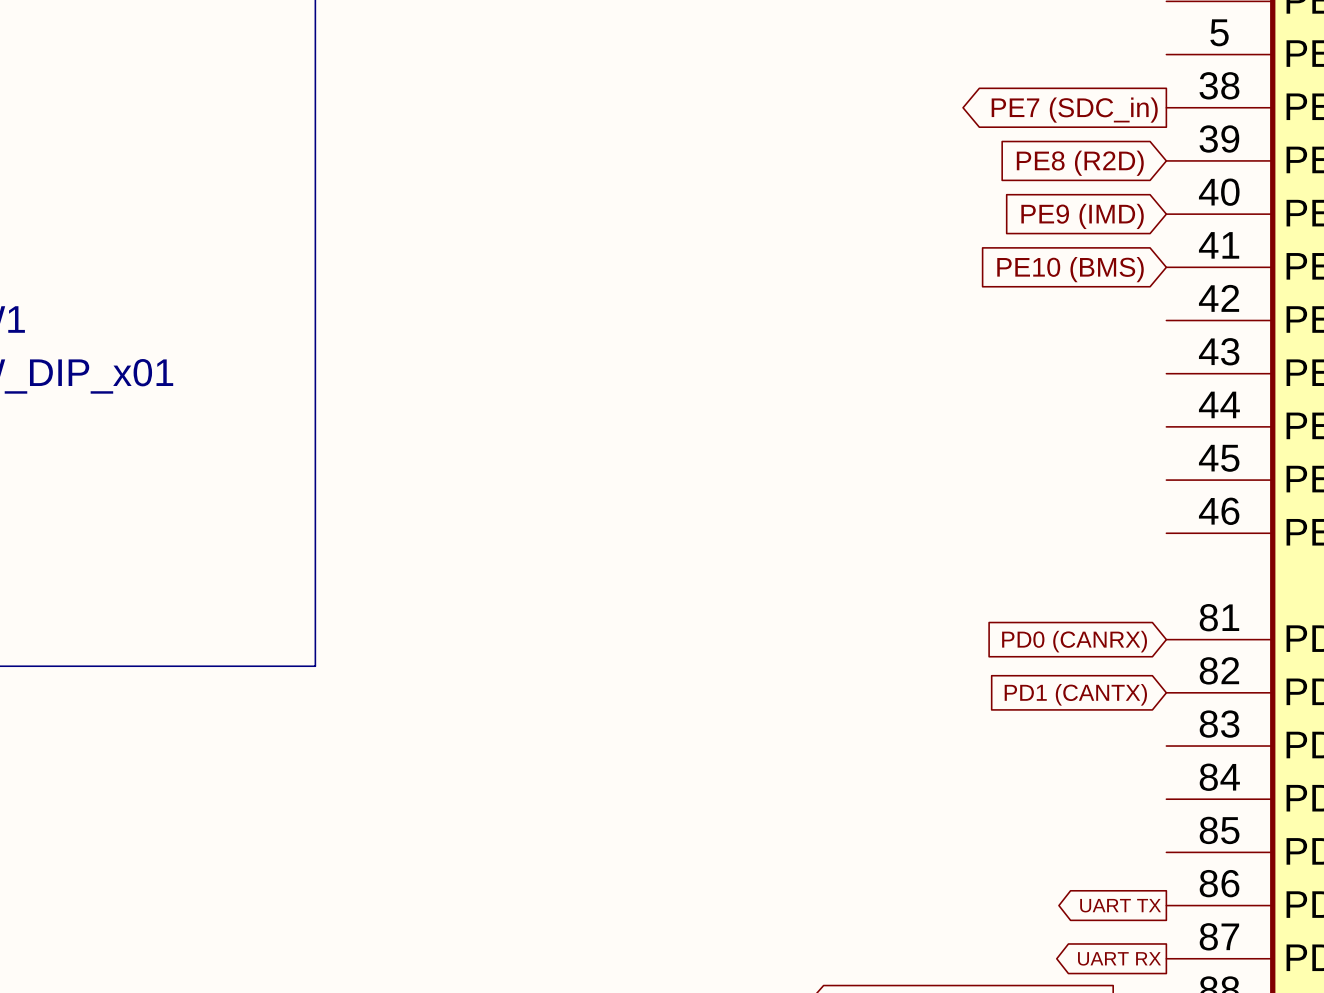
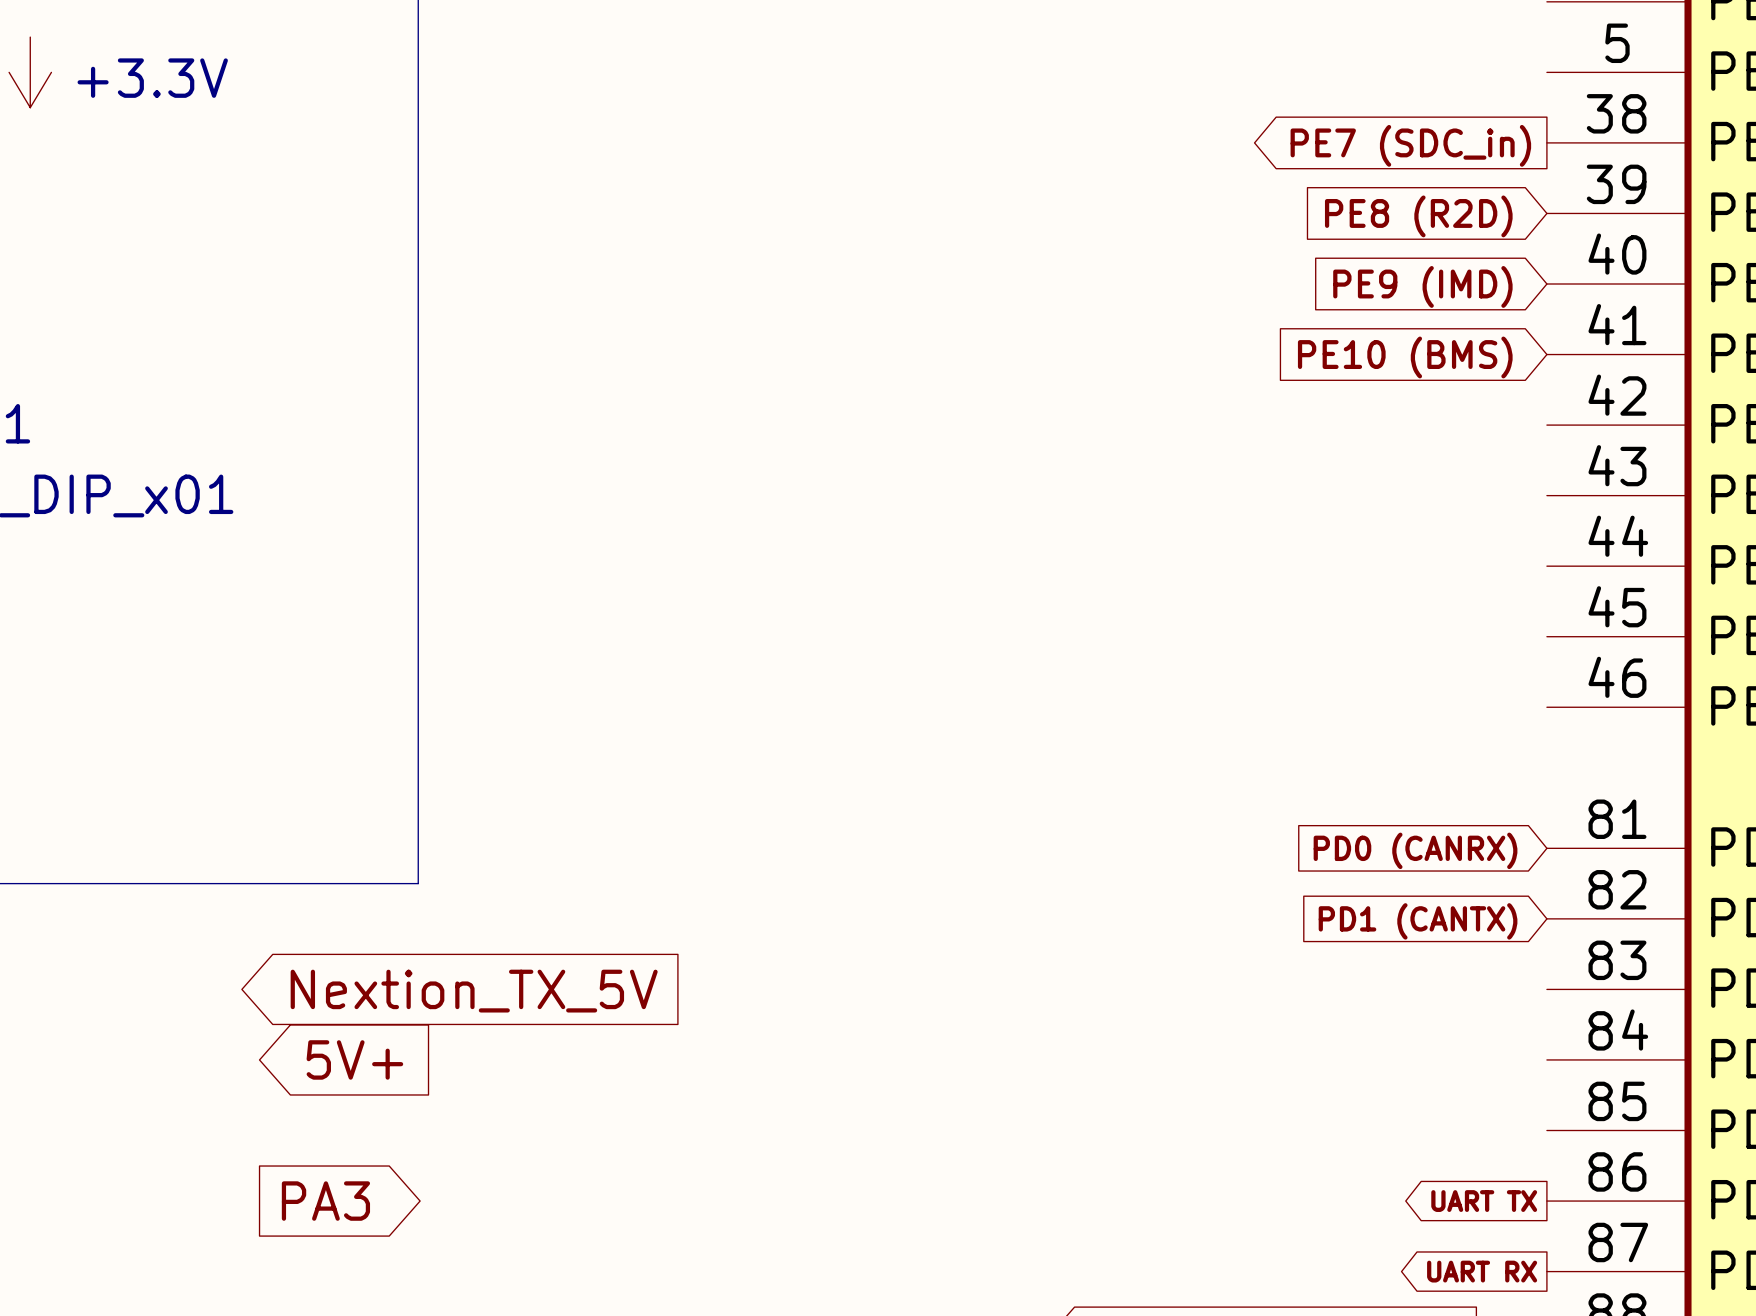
power symbol: none -> +3.3V (30, 72)
global label: none -> Nextion_TX_5V (474, 991)
global label: none -> 5V+ (354, 1059)
global label: none -> PA3 (325, 1201)

